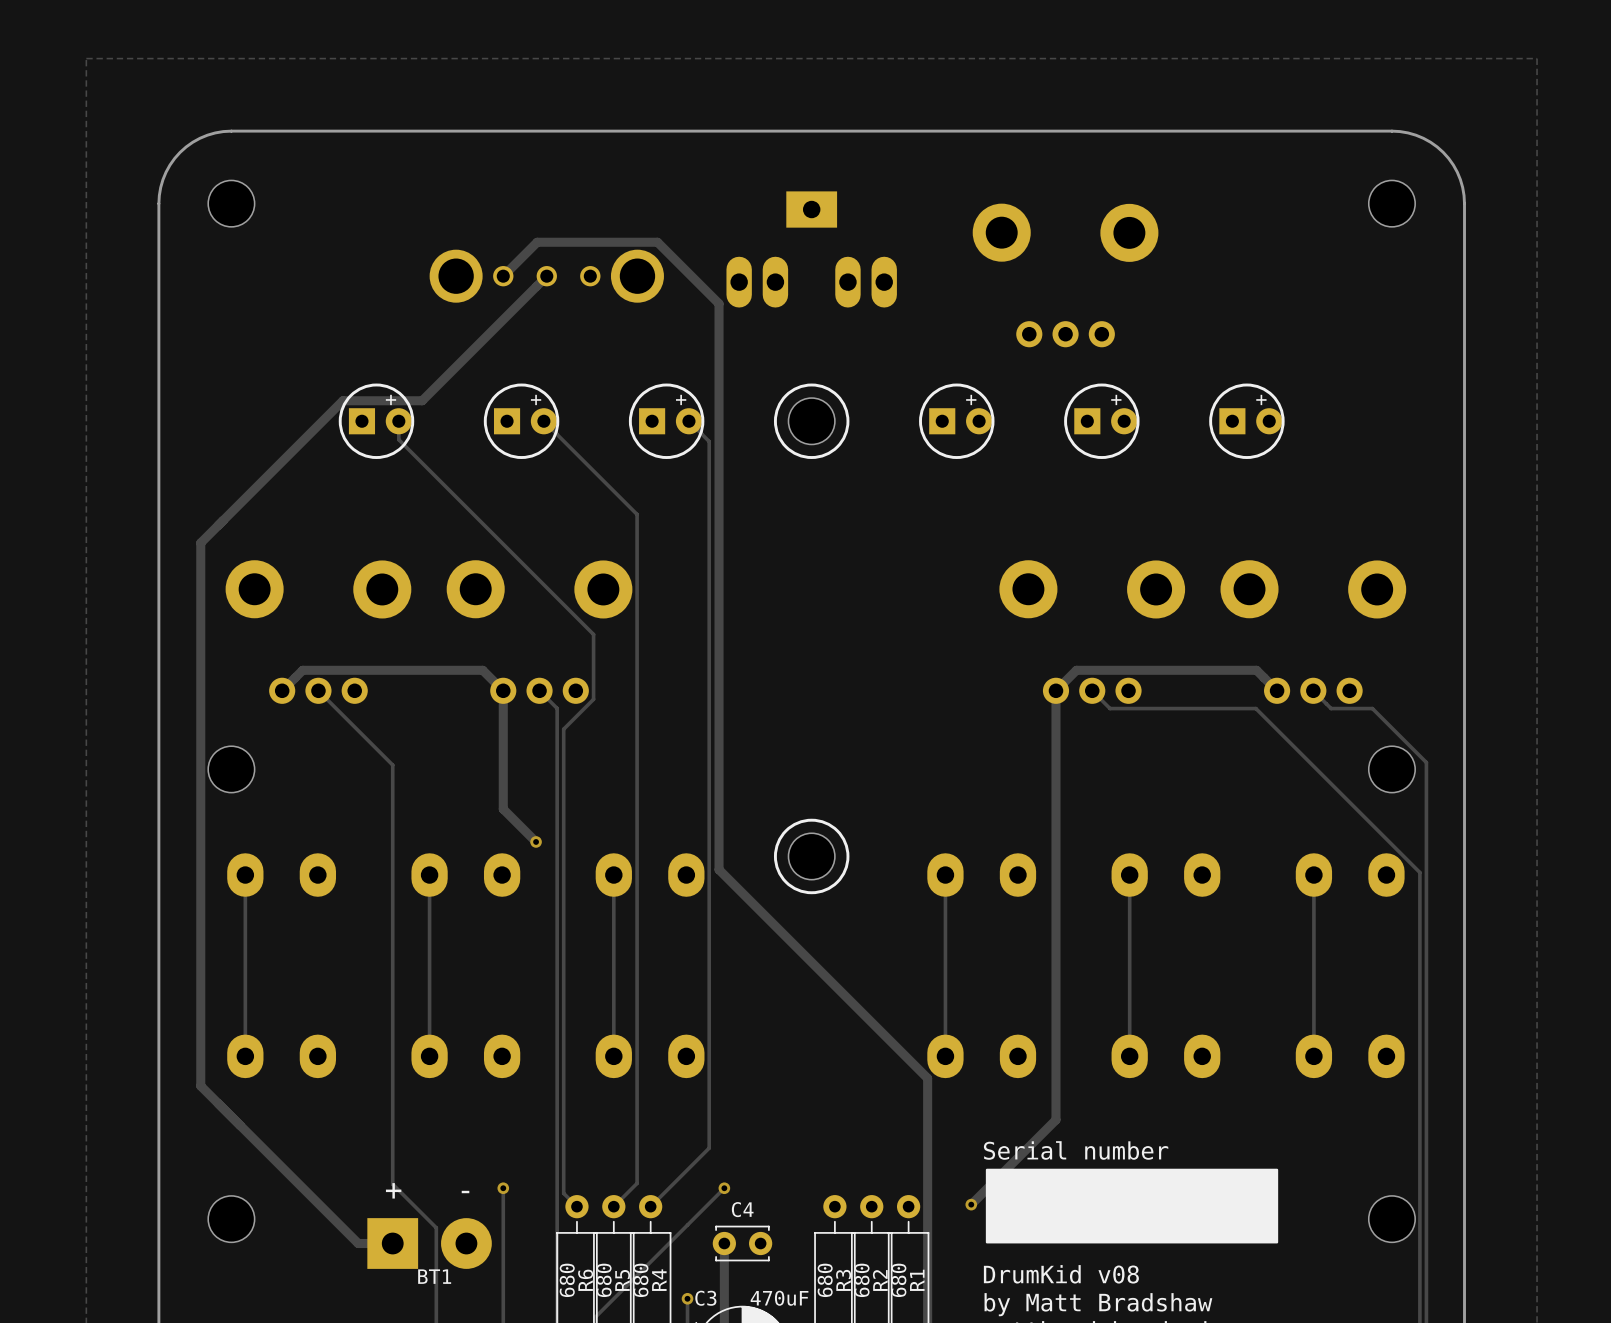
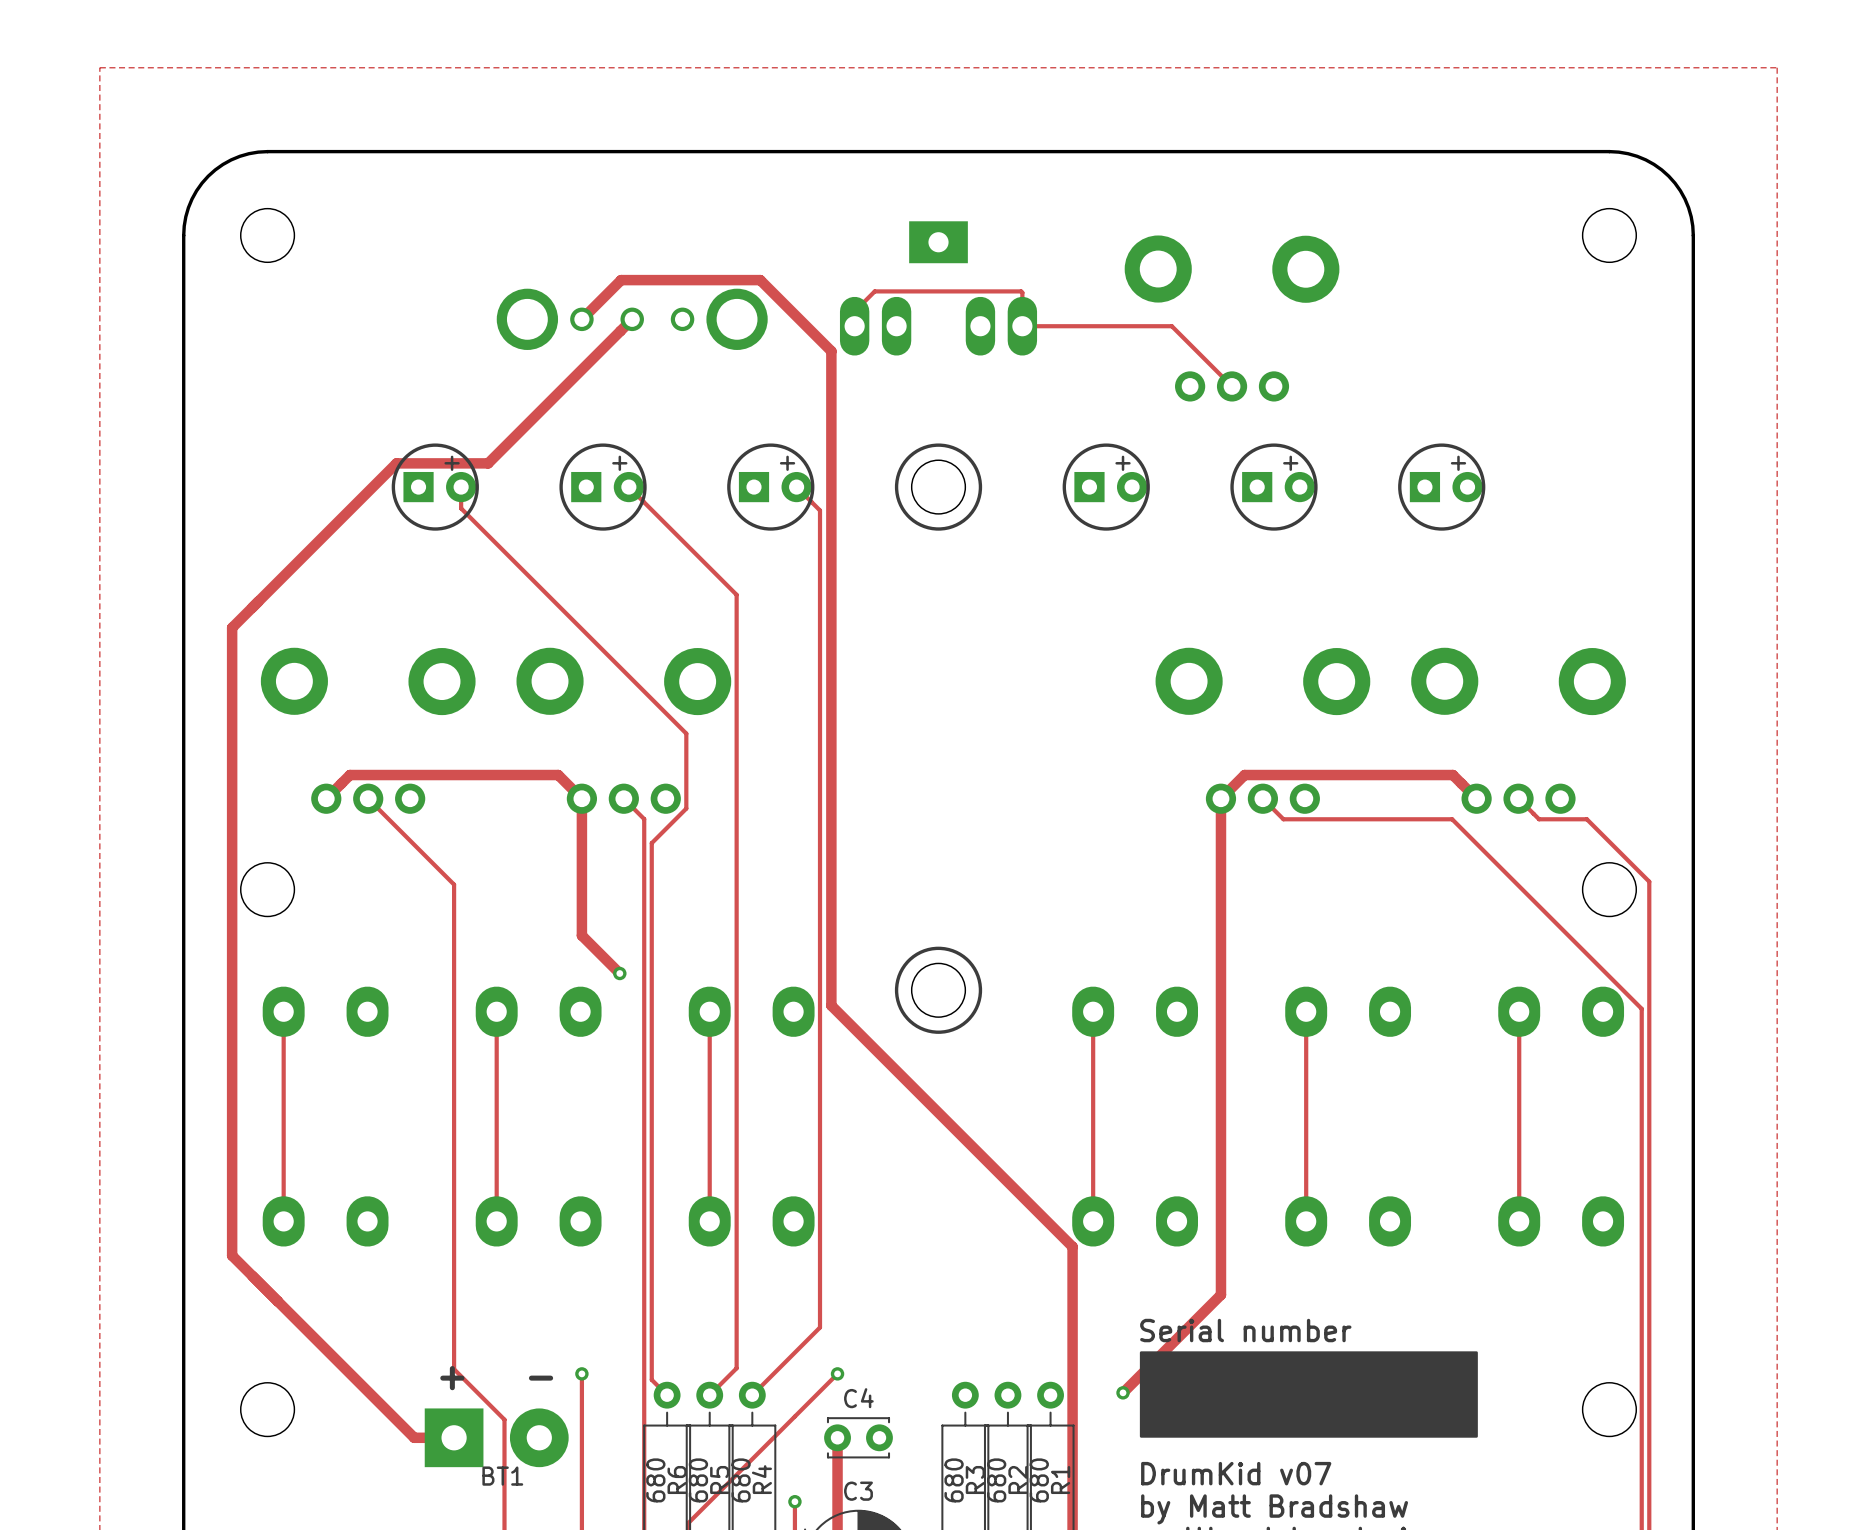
track: none -> (854, 311) (874, 291) (1021, 291) (1022, 326) (1171, 326) (1232, 386)
text: DrumKid v08 (1061, 1274) -> DrumKid v07 (1236, 1473)
C3 name position: C3 (705, 1298) -> C3 (858, 1491)
C3 value: 470uF (779, 1298) -> none

